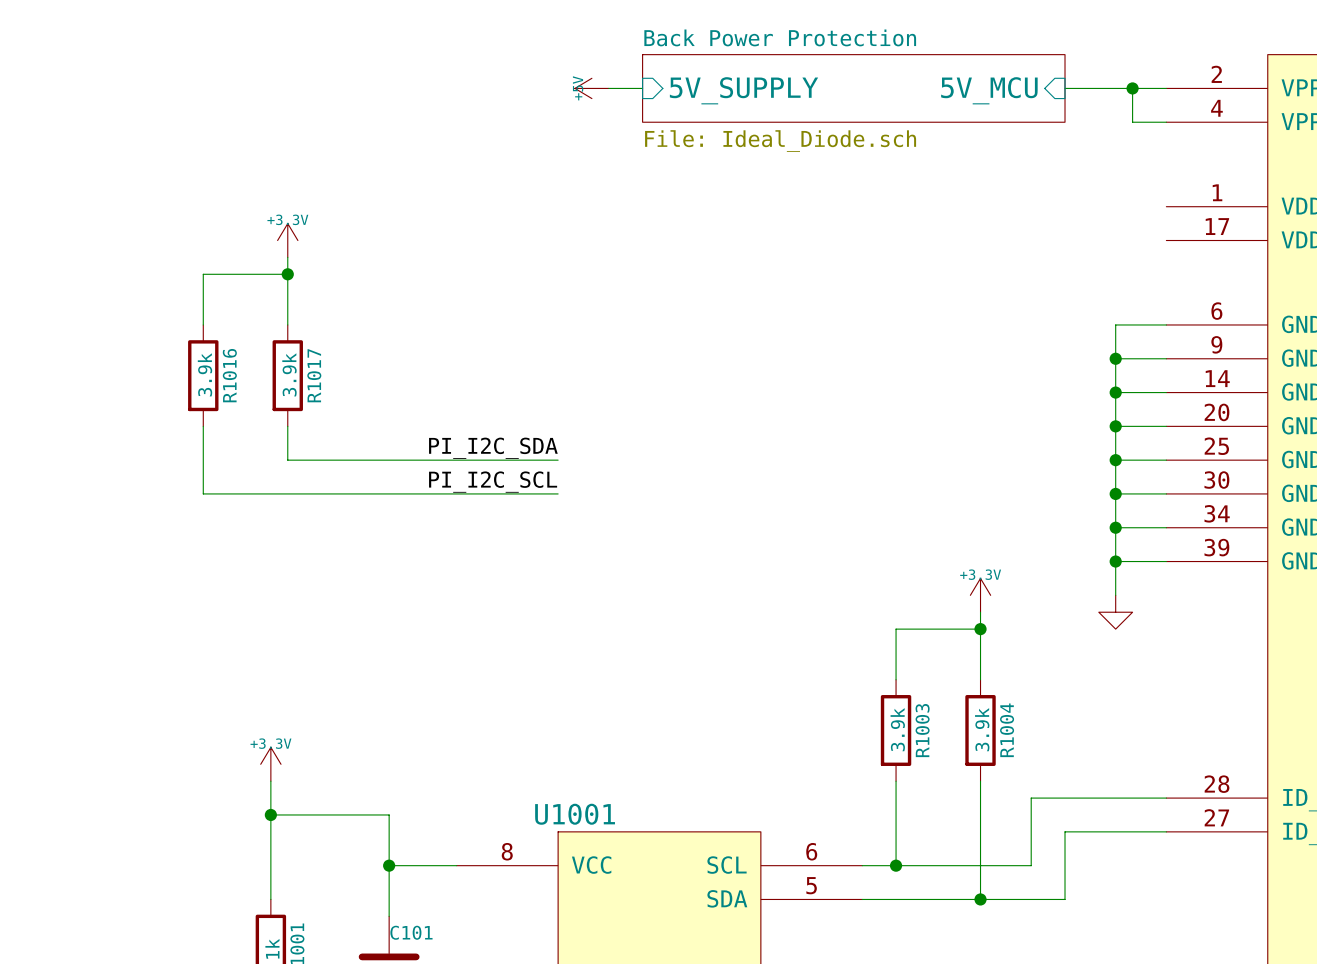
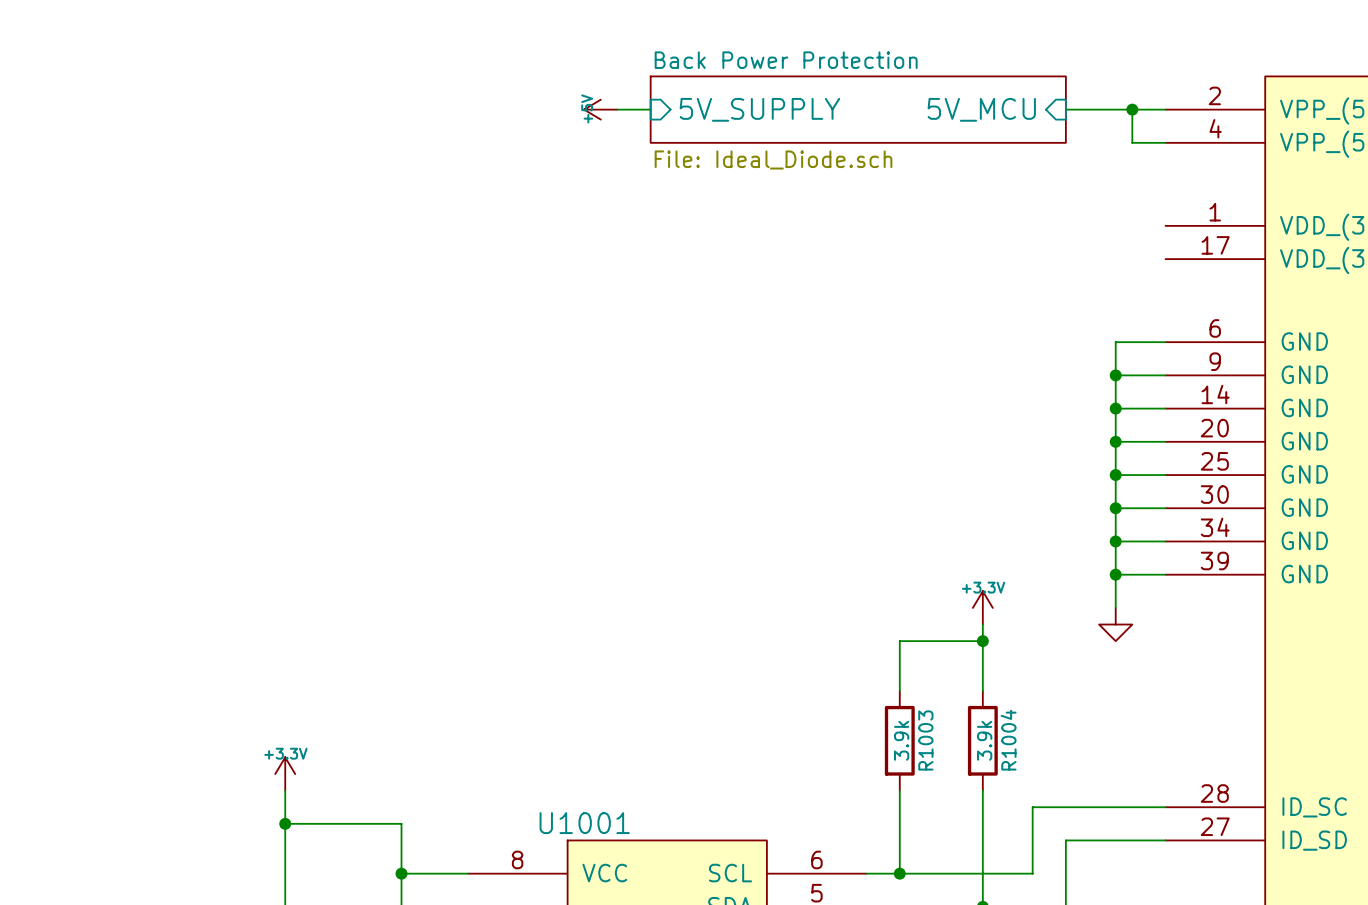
power symbol: +3.3V (287, 240) -> none
wire: (287, 257) (287, 324) -> none
wire: (287, 274) (203, 274) (203, 324) -> none
junction: (287, 274) -> none
R1016: 3.9k (203, 375) -> none
R1017: 3.9k (287, 375) -> none
wire: (203, 426) (203, 493) (558, 493) -> none
wire: (287, 426) (287, 460) (558, 460) -> none
label: PI_I2C_SDA (493, 448) -> none
label: PI_I2C_SCL (493, 482) -> none

